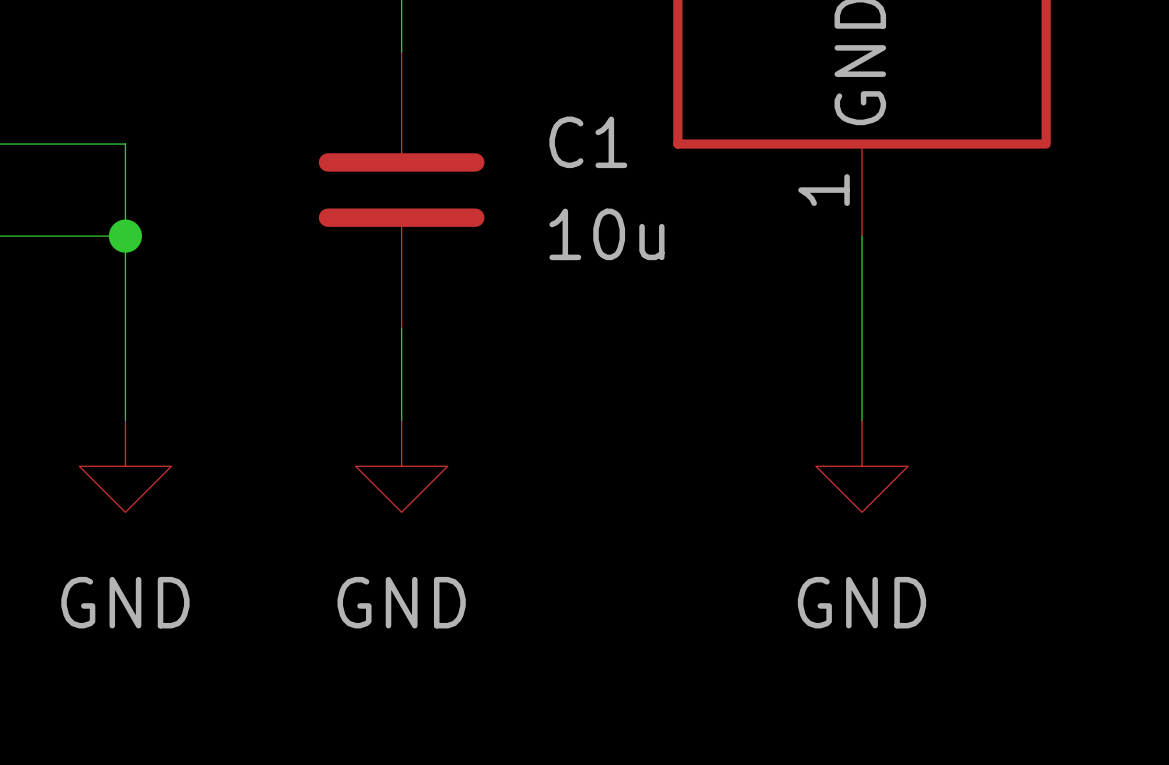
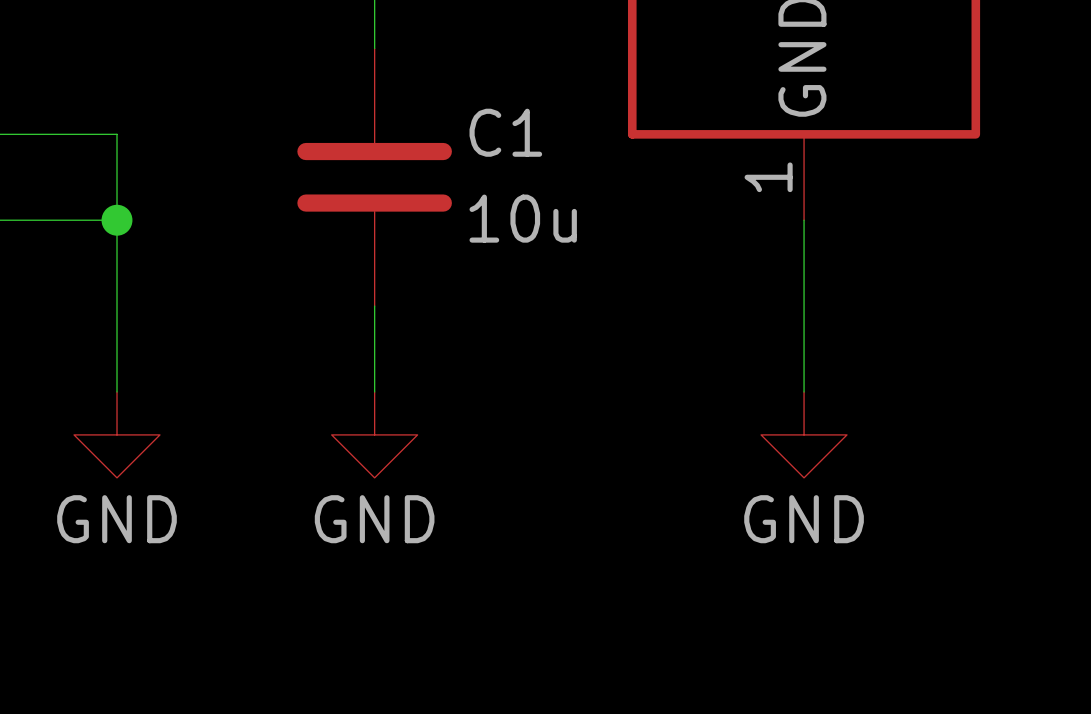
C1 name position: C1 (588, 142) -> C1 (505, 132)
C1 value position: 10u (606, 234) -> 10u (523, 218)
power symbol text position: GND (125, 602) -> GND (117, 519)
power symbol text position: GND (401, 602) -> GND (374, 519)
power symbol text position: GND (862, 602) -> GND (804, 519)

